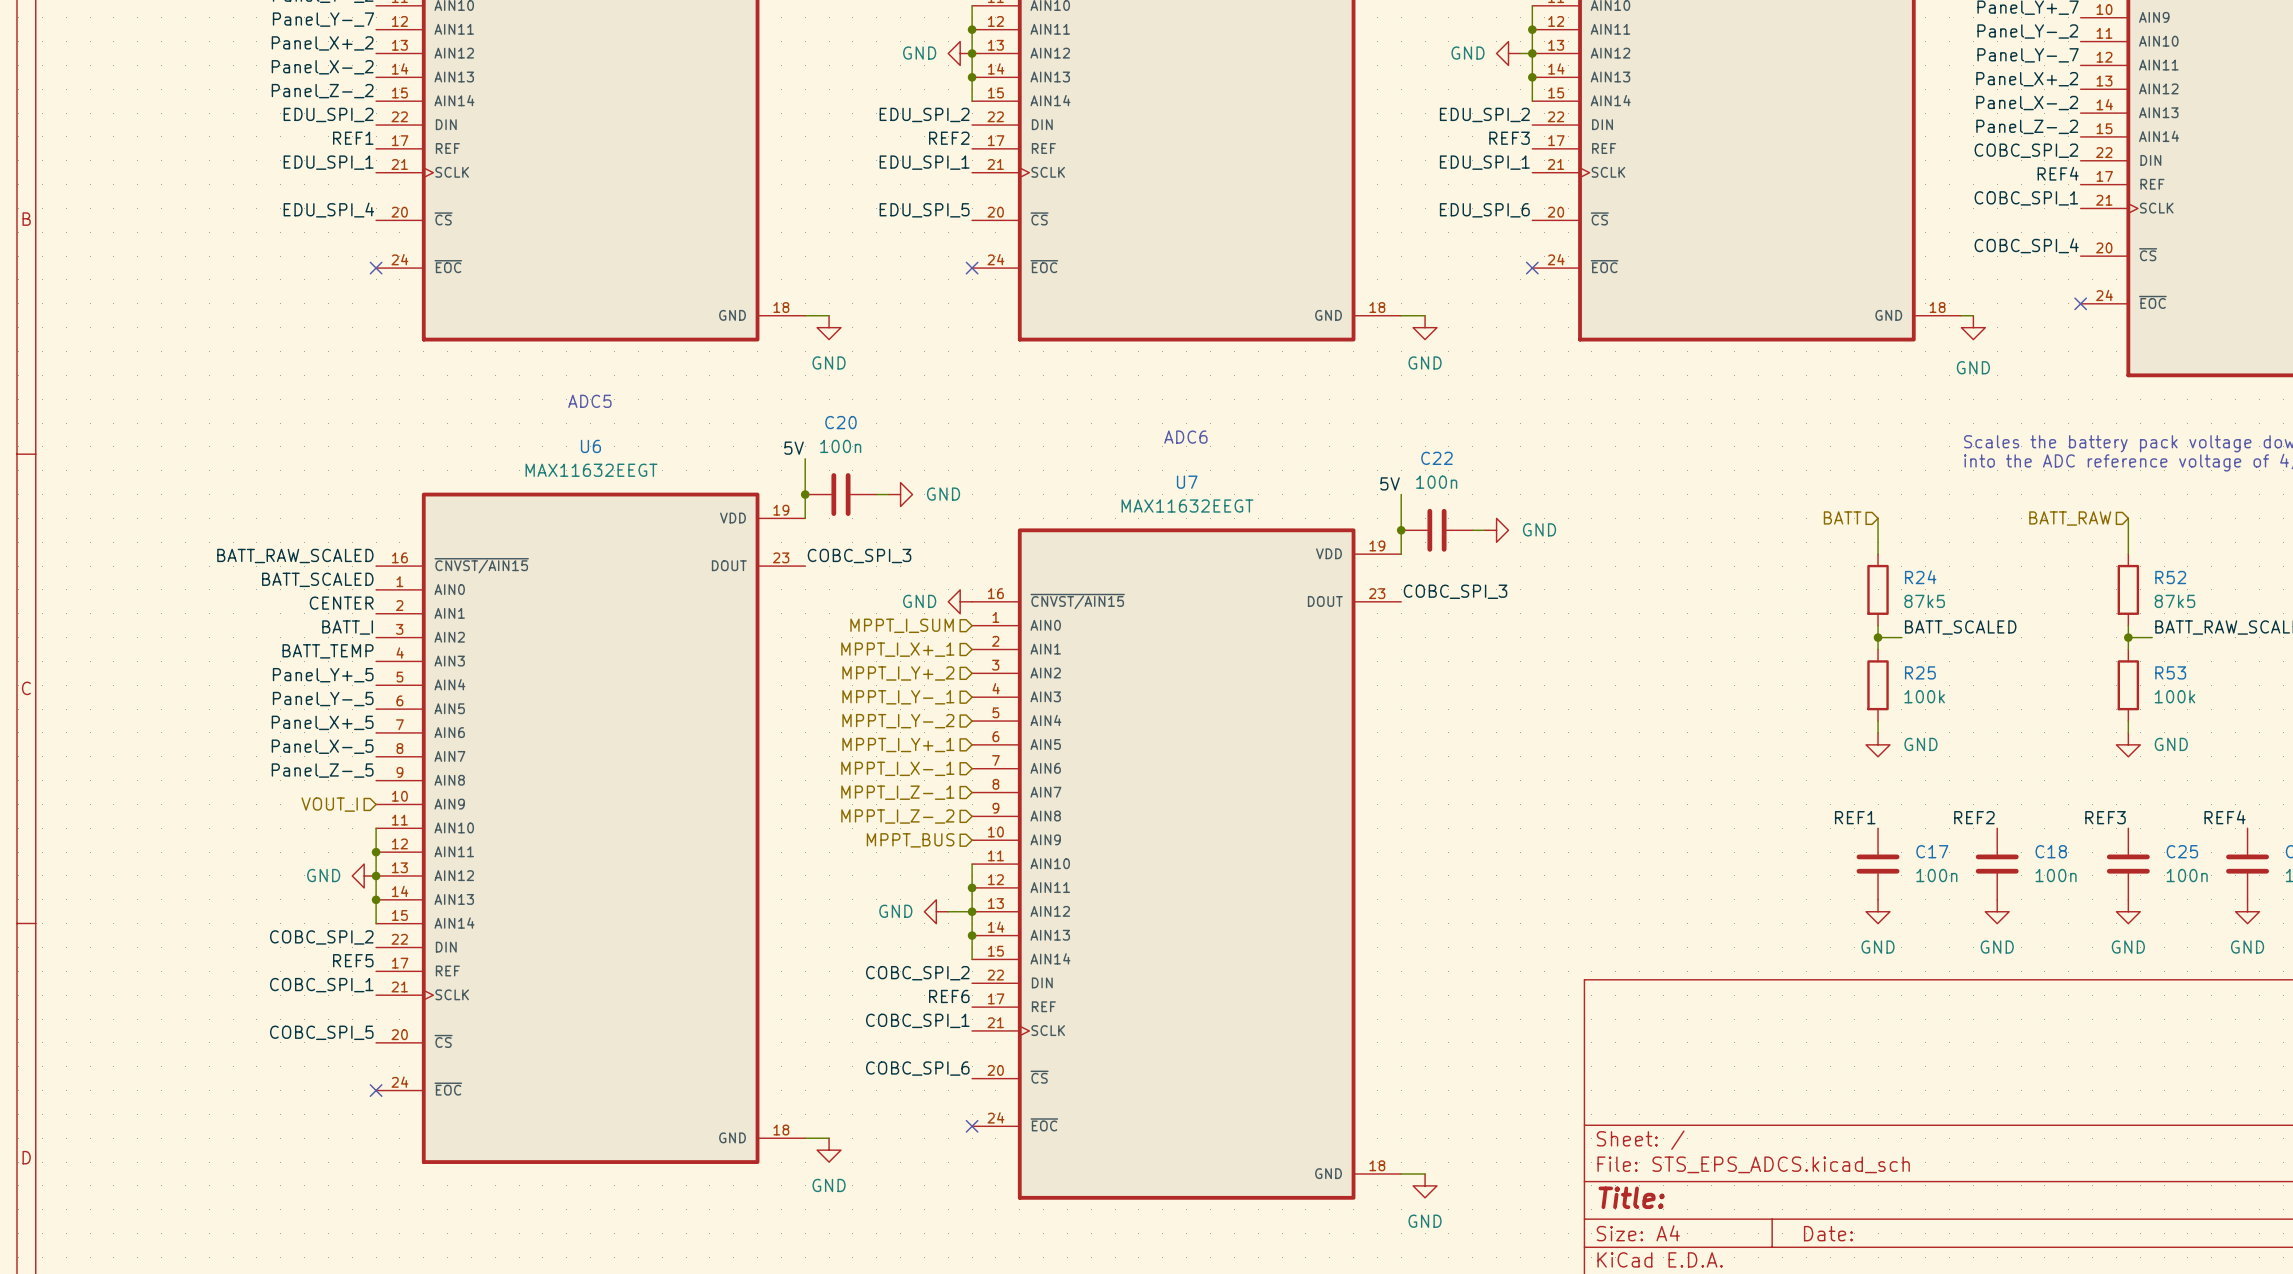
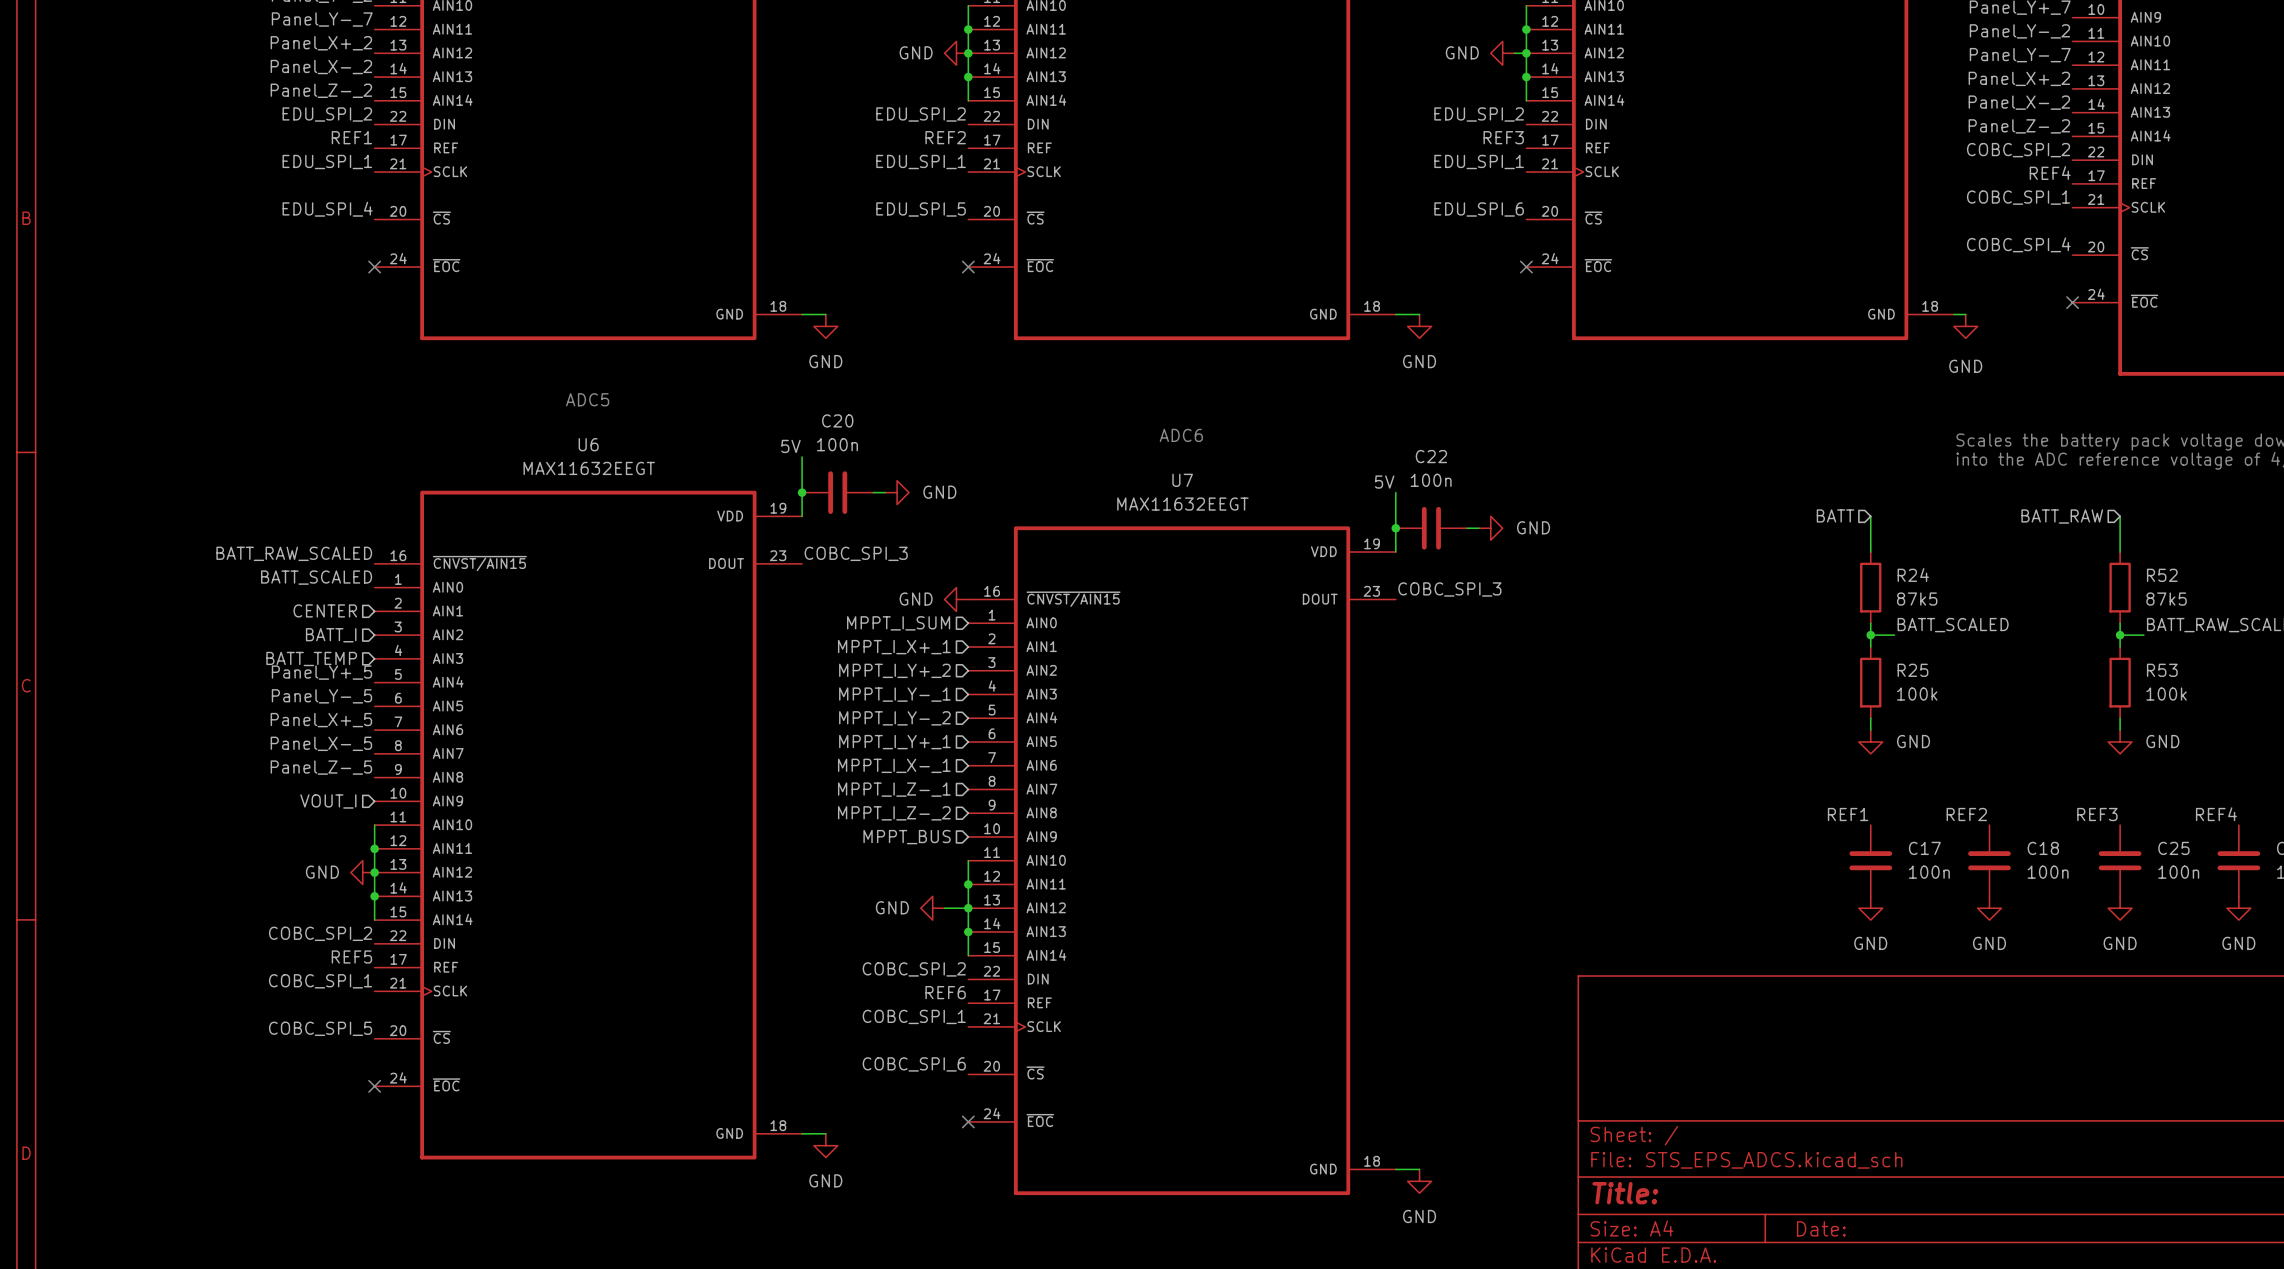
label: CENTER (341, 603) -> none
hierarchical label: none -> CENTER (325, 610)
label: BATT_I (347, 627) -> none
hierarchical label: none -> BATT_I (331, 635)
label: BATT_TEMP (328, 651) -> none
hierarchical label: none -> BATT_TEMP (311, 658)

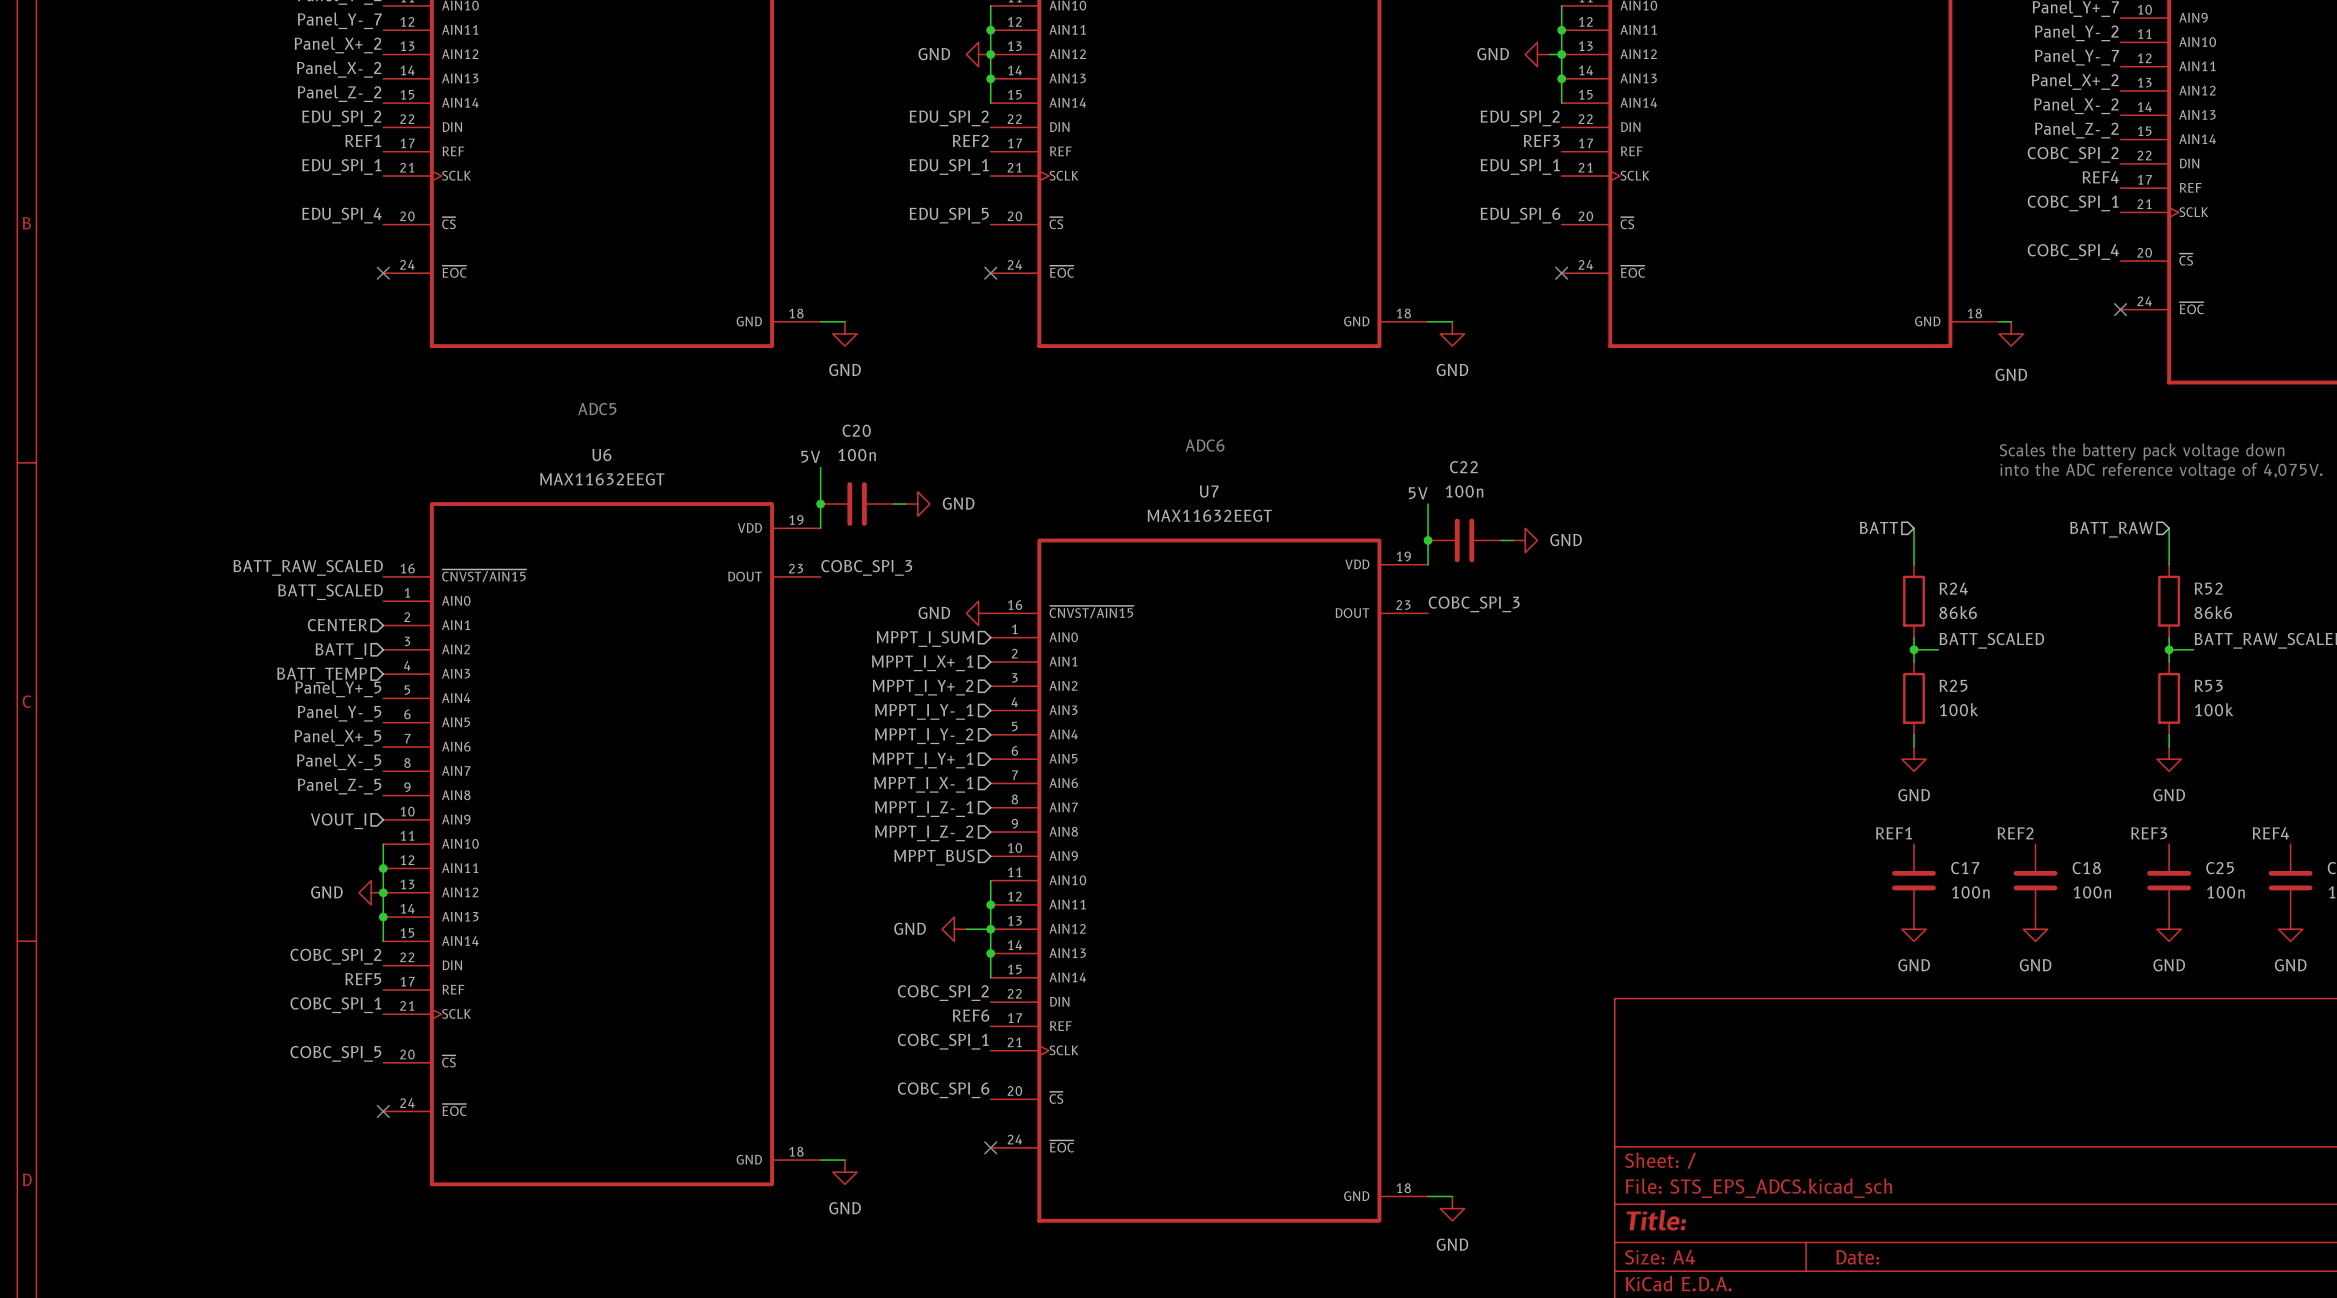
R24 value: 87k5 (1917, 599) -> 86k6 (1958, 612)
R52 value: 87k5 (2166, 599) -> 86k6 (2213, 612)
power symbol text position: GND (1913, 741) -> GND (1914, 795)
power symbol text position: GND (2162, 741) -> GND (2169, 795)

